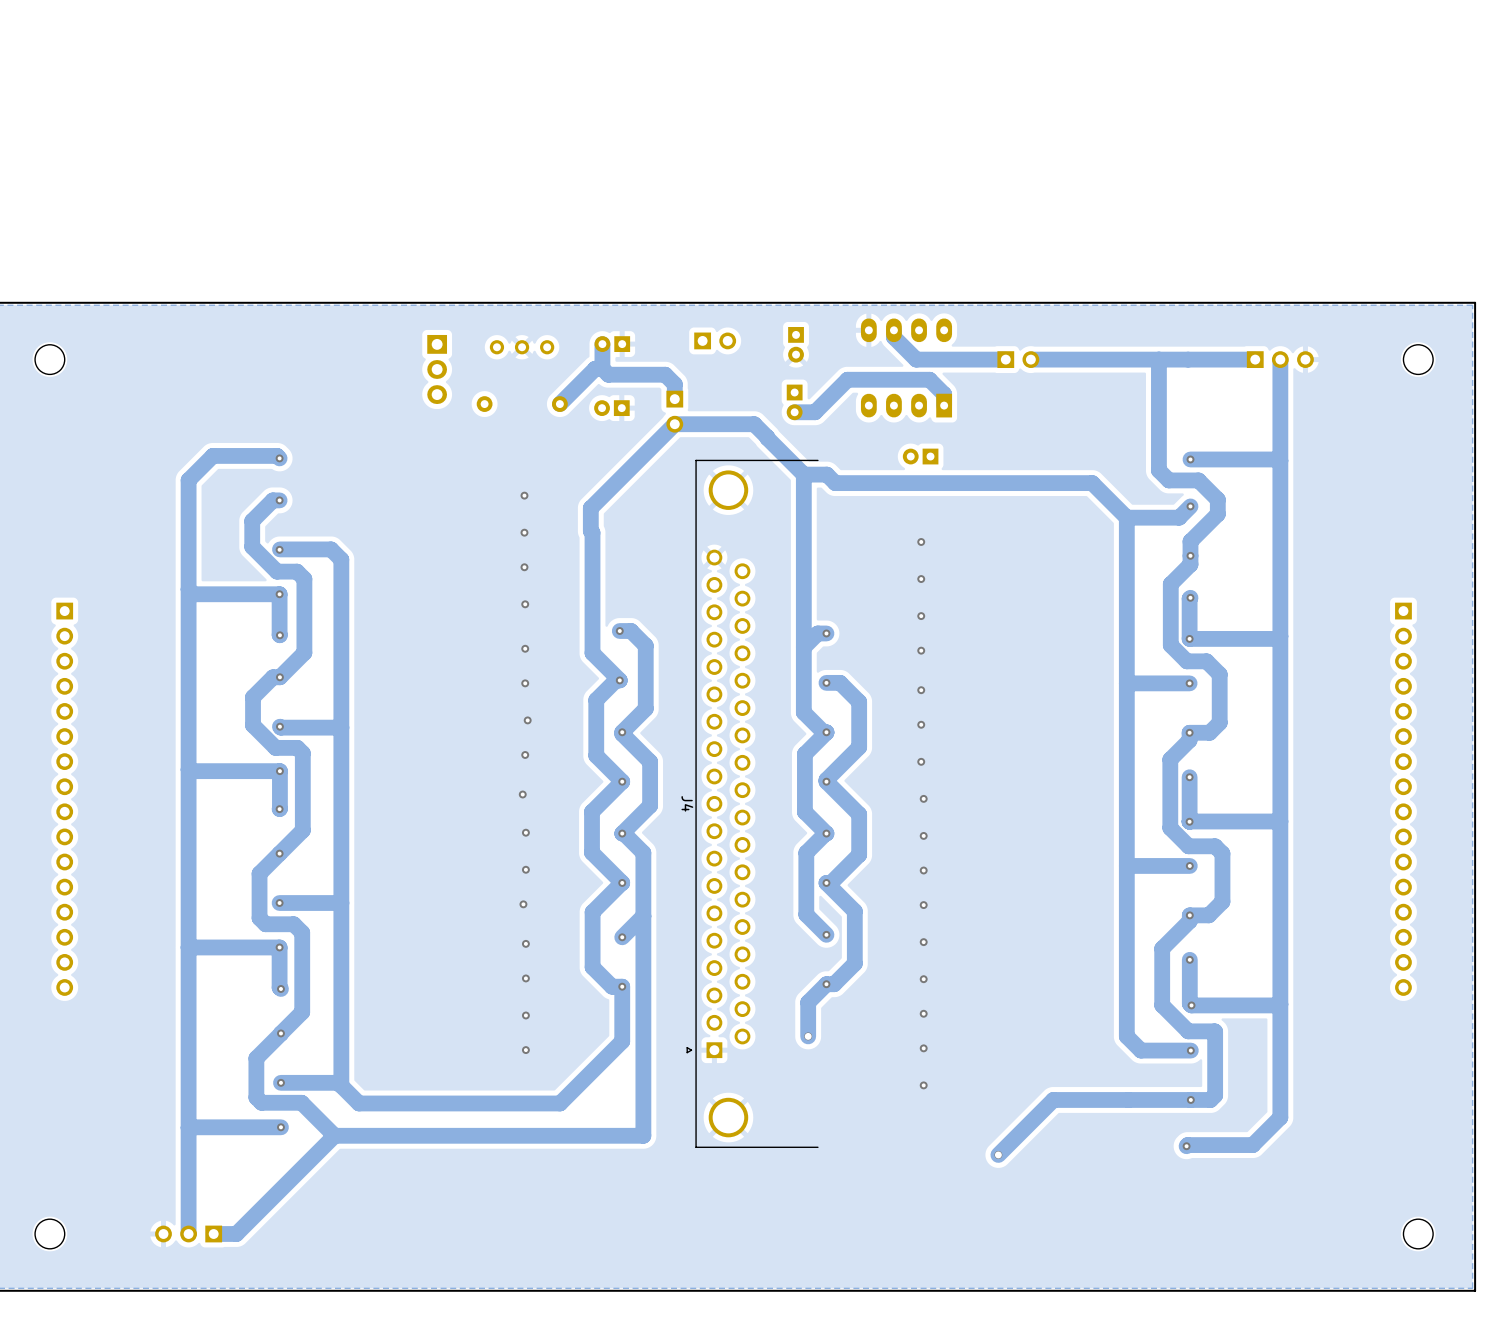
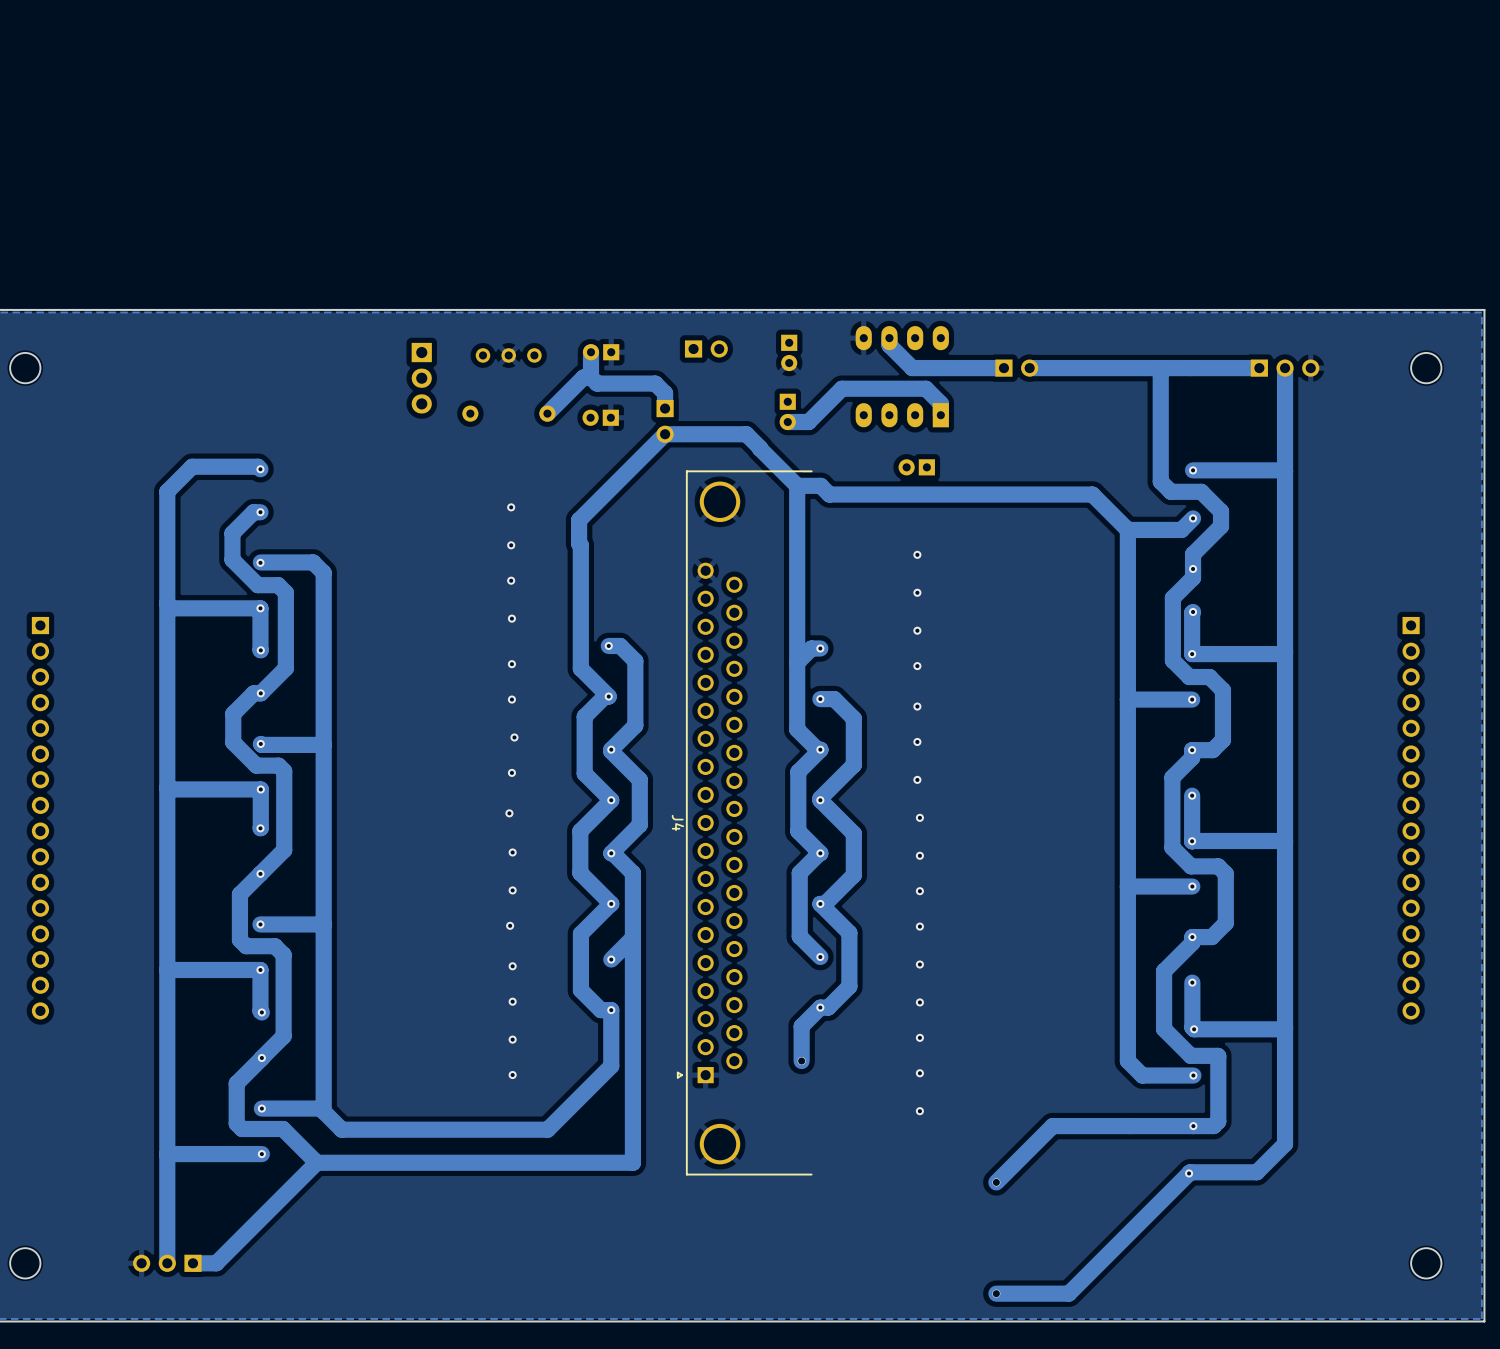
track: none -> (1189, 1173) (1068, 1293) (996, 1293)
via: none -> (996, 1293)

